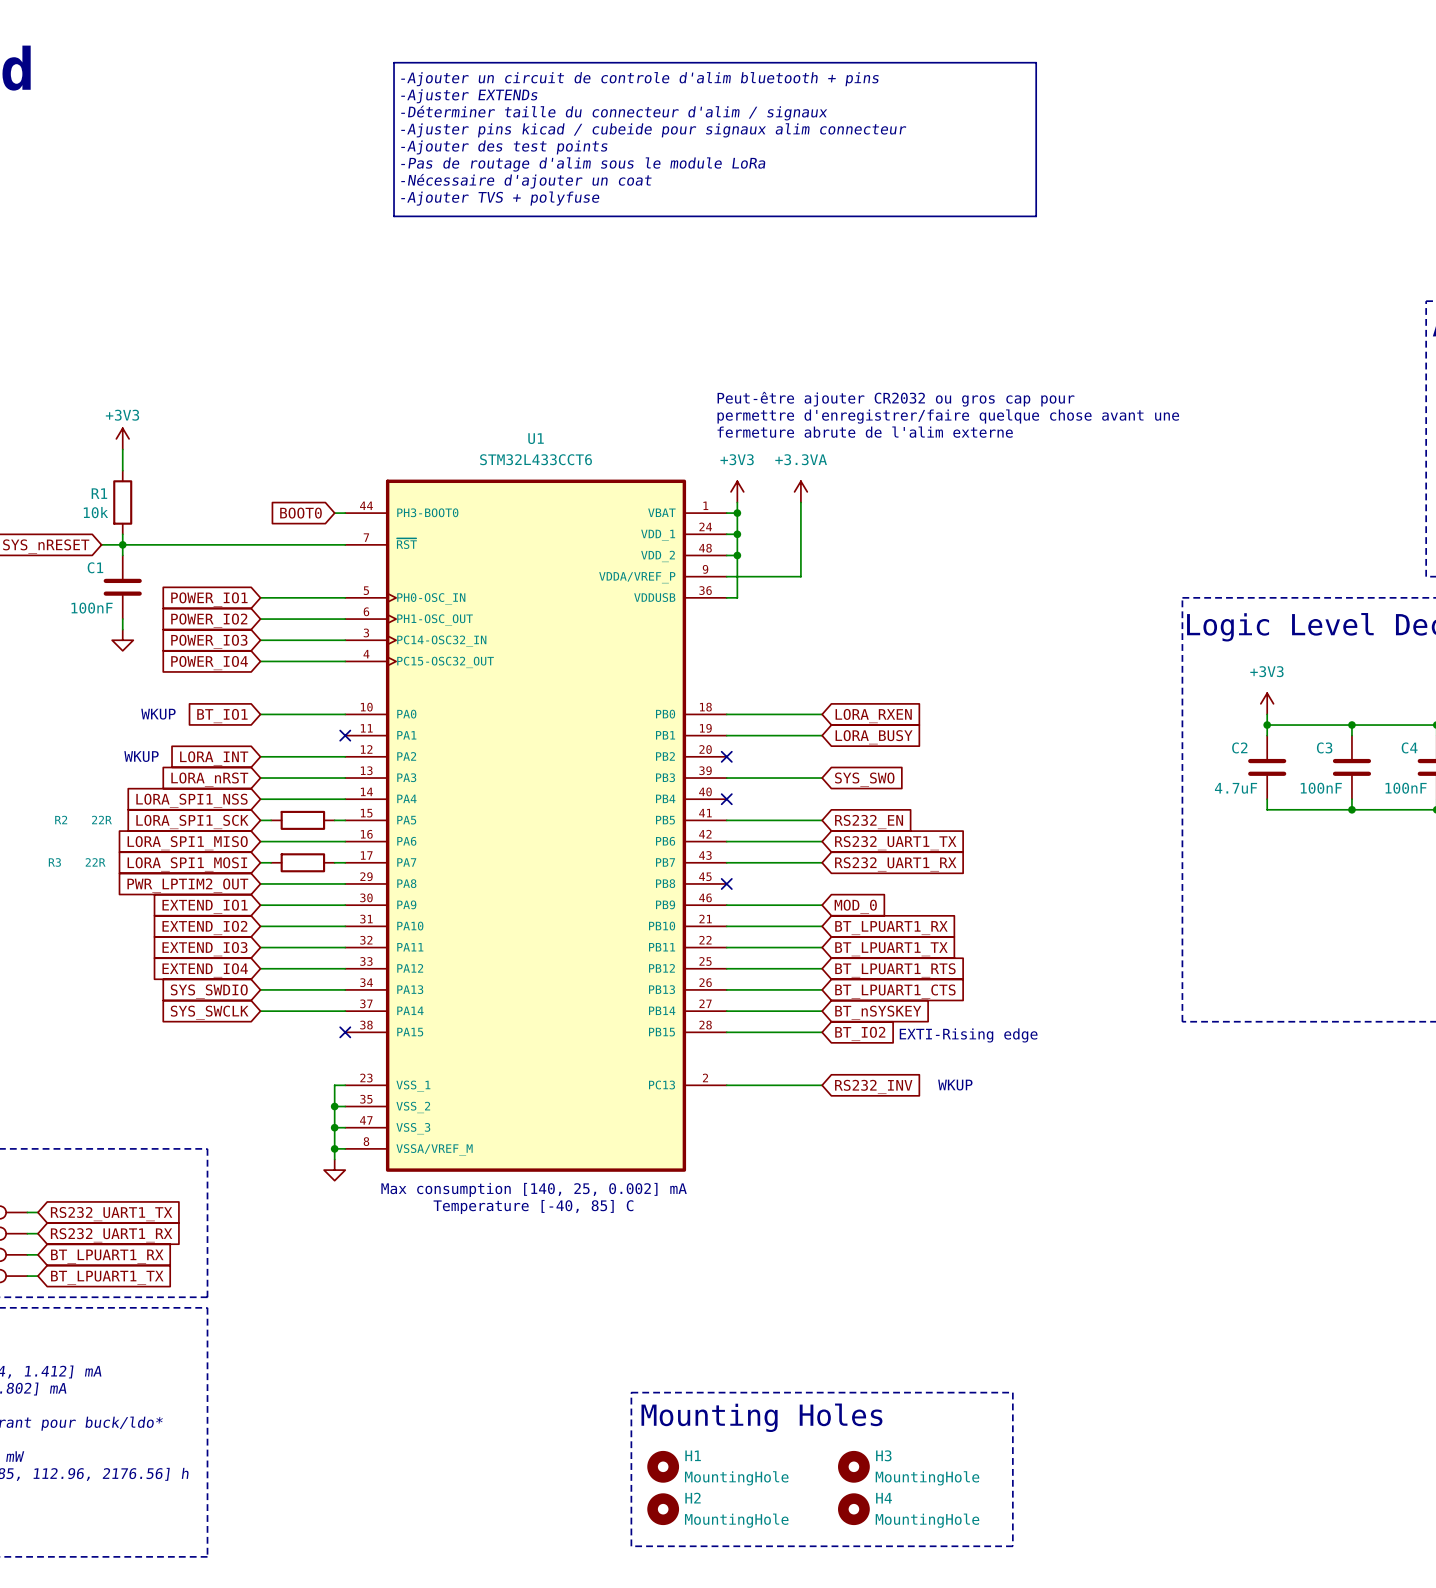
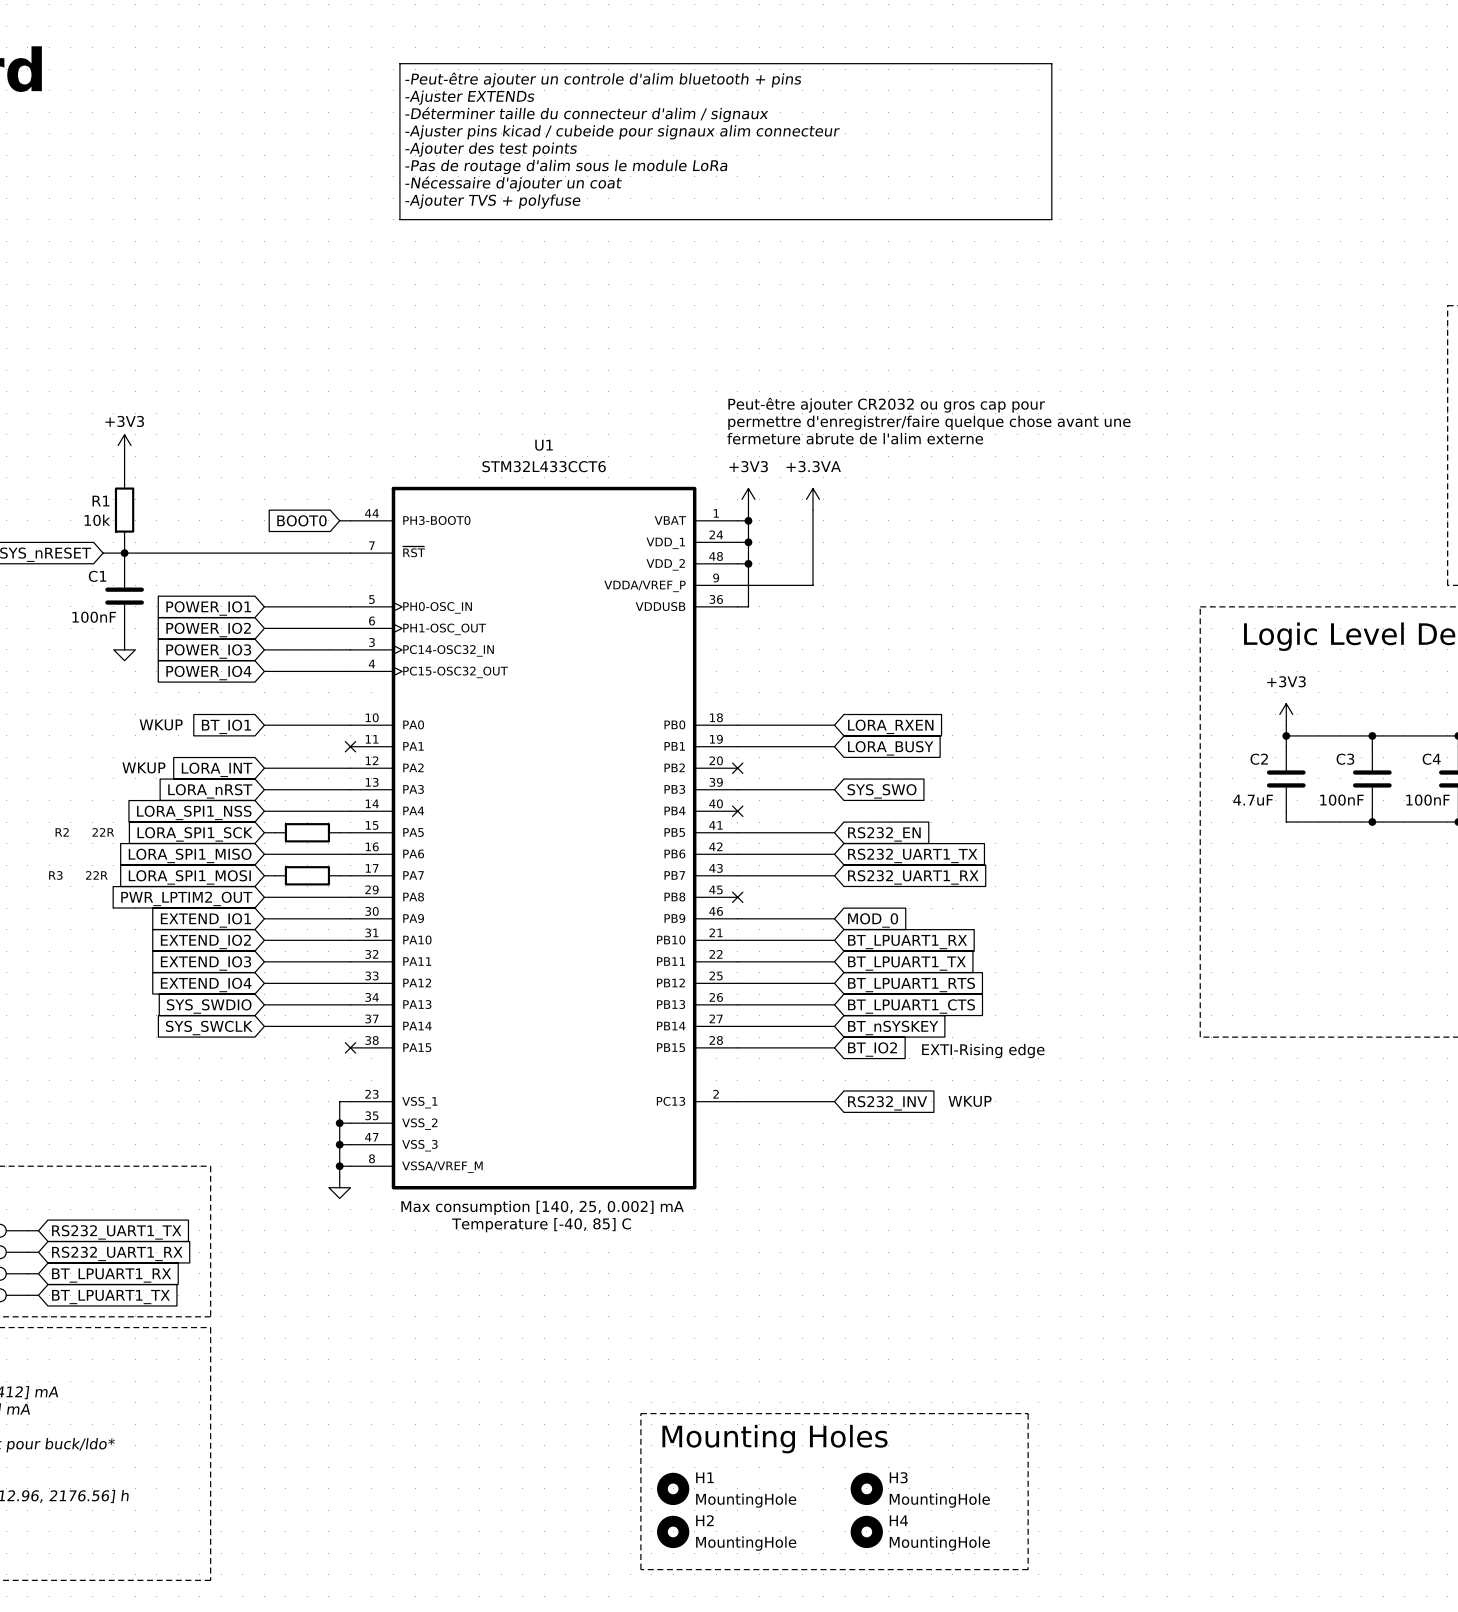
text: -Ajouter un circuit de controle d'alim bluetooth + pins (639, 79) -> -Peut-être ajouter un controle d'alim bluetooth + pins (603, 80)

